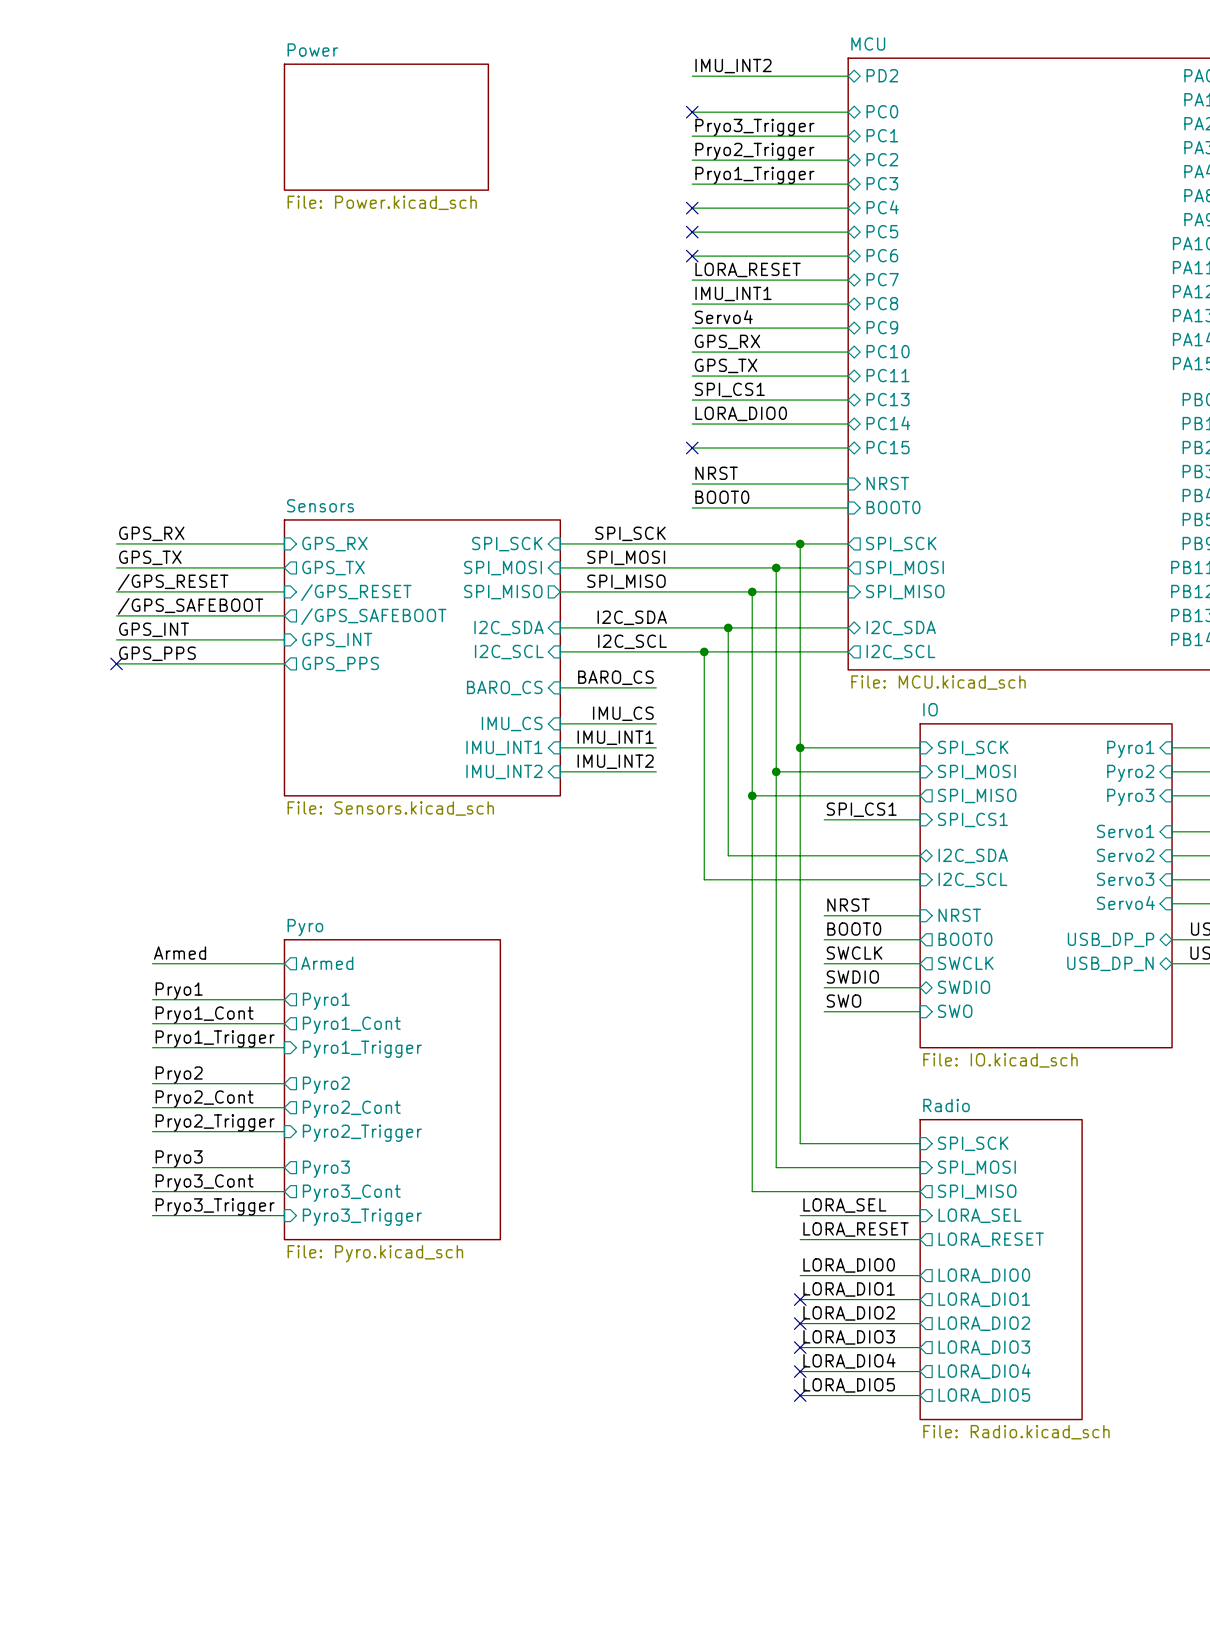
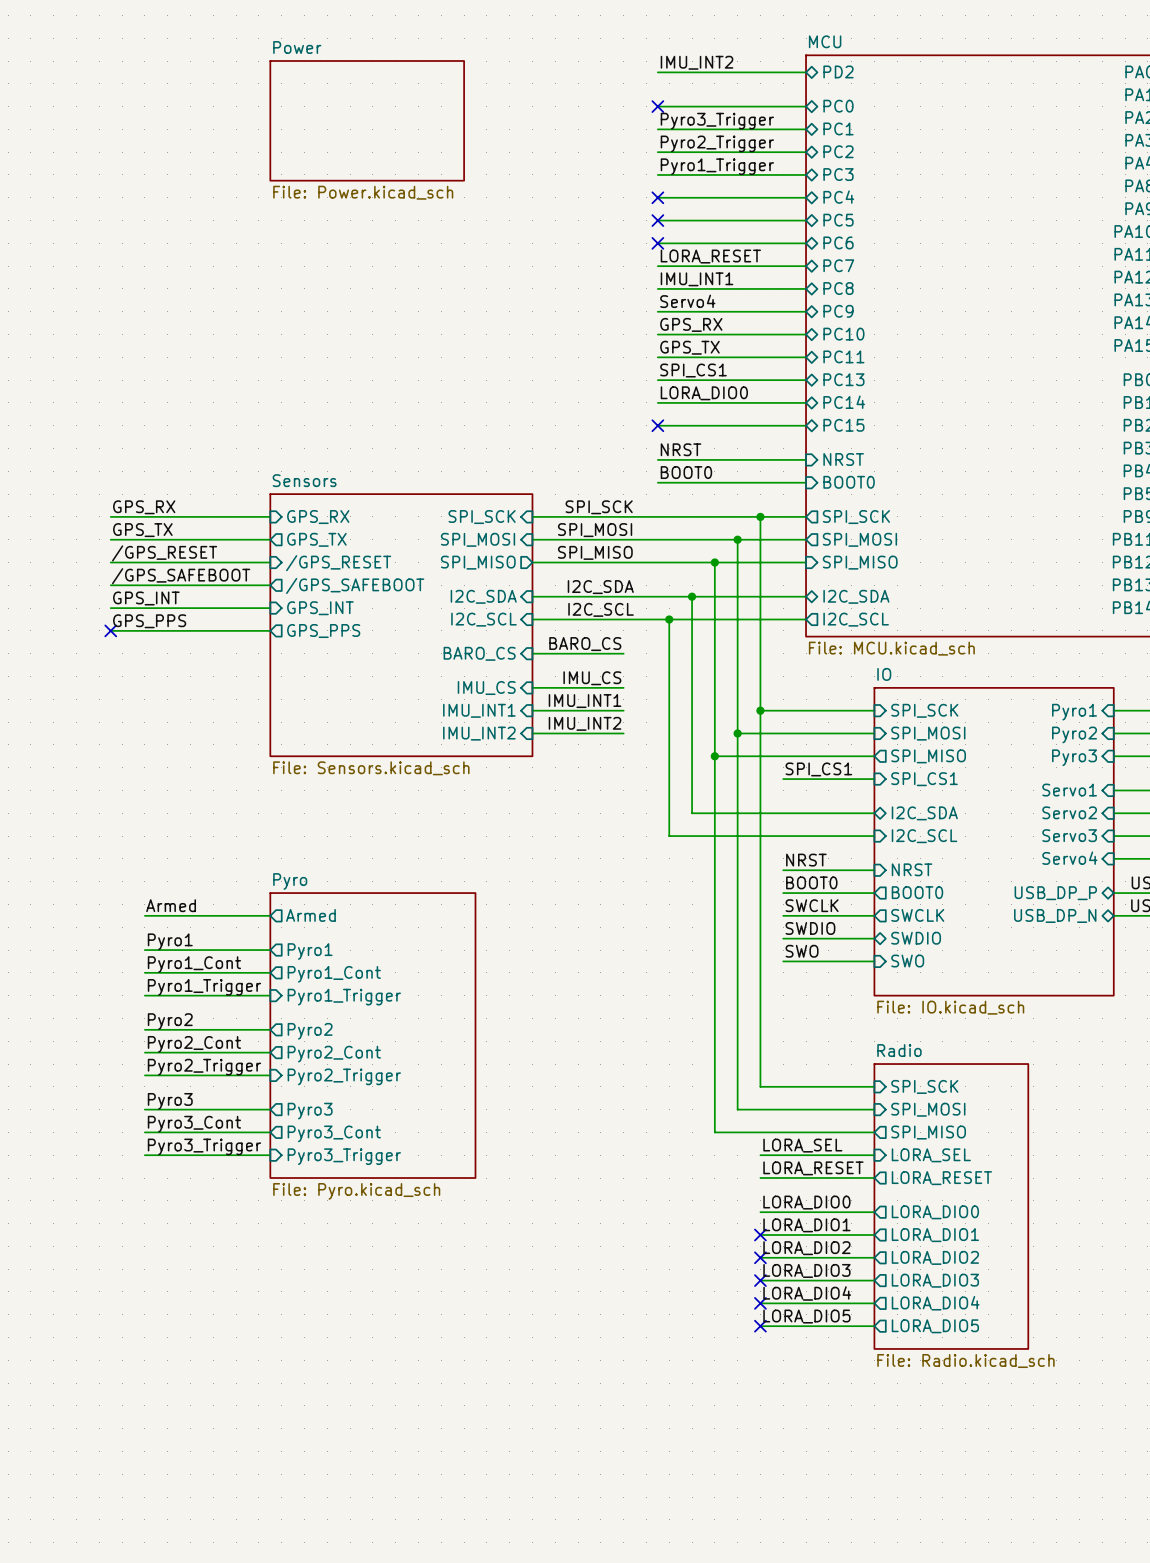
label: Pryo3_Trigger (754, 127) -> Pyro3_Trigger (717, 121)
label: Pryo2_Trigger (754, 151) -> Pyro2_Trigger (717, 143)
label: Pryo1_Trigger (754, 175) -> Pyro1_Trigger (717, 166)
label: Pryo1 (179, 991) -> Pyro1 (170, 941)
label: Pryo1_Cont (204, 1015) -> Pyro1_Cont (194, 964)
label: Pryo1_Trigger (215, 1039) -> Pyro1_Trigger (204, 987)
label: Pryo2 (179, 1074) -> Pyro2 (170, 1021)
label: Pryo2_Cont (204, 1098) -> Pyro2_Cont (194, 1044)
label: Pryo2_Trigger (215, 1122) -> Pyro2_Trigger (204, 1067)
label: Pryo3 (179, 1158) -> Pyro3 (170, 1101)
label: Pryo3_Cont (204, 1182) -> Pyro3_Cont (194, 1124)
label: Pryo3_Trigger (215, 1206) -> Pyro3_Trigger (204, 1146)

